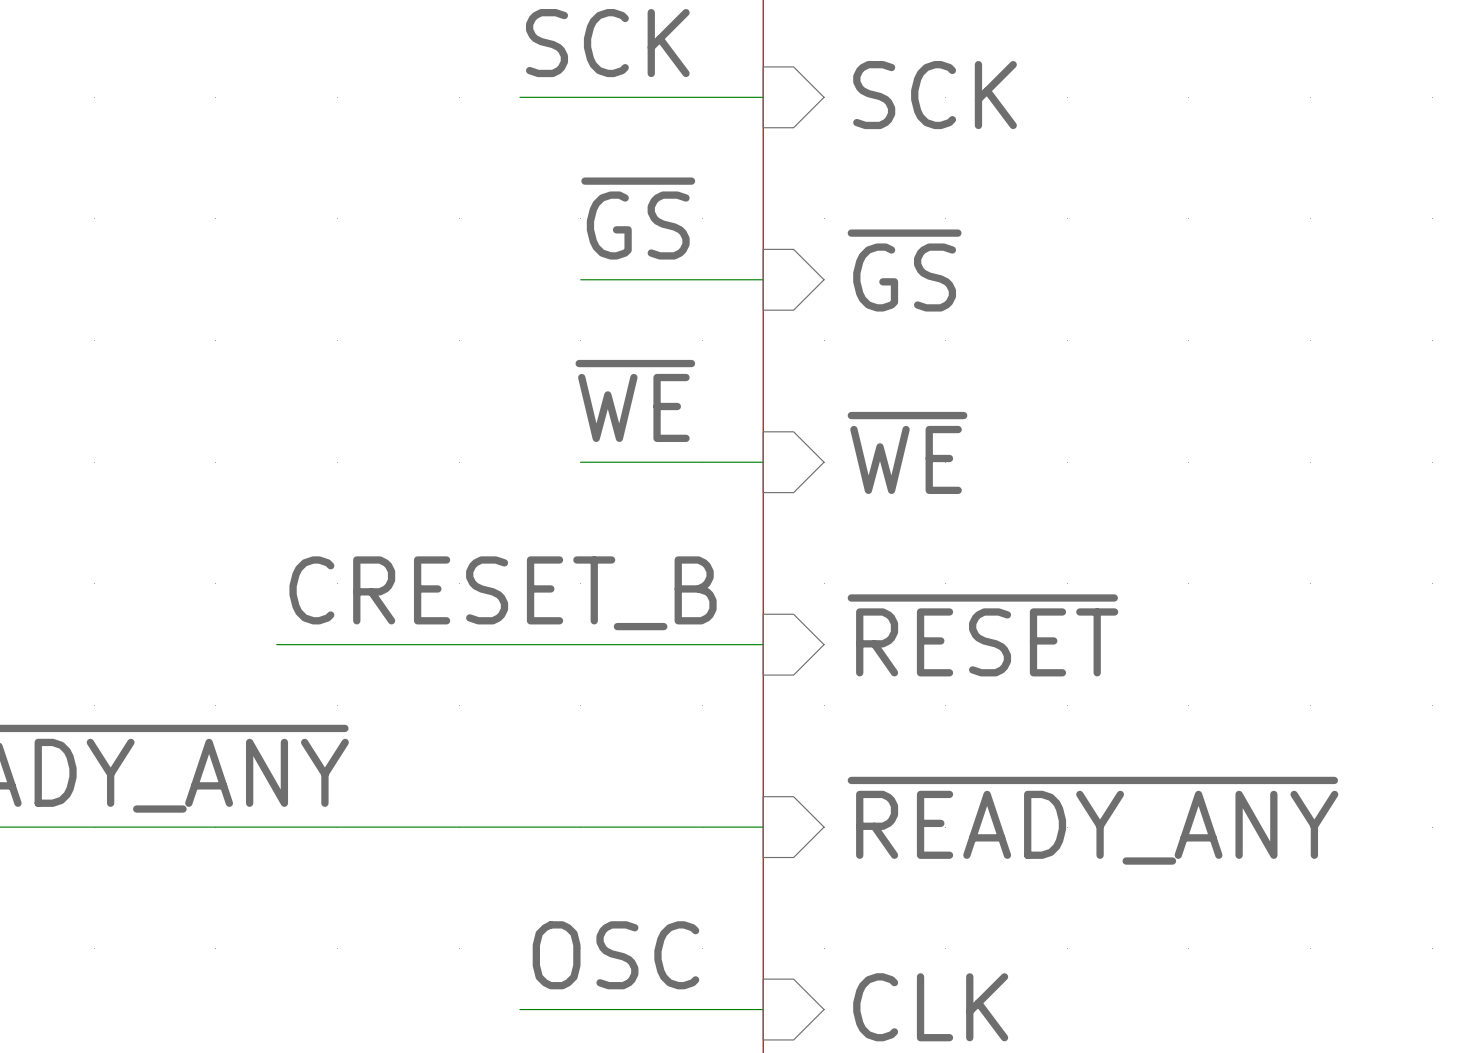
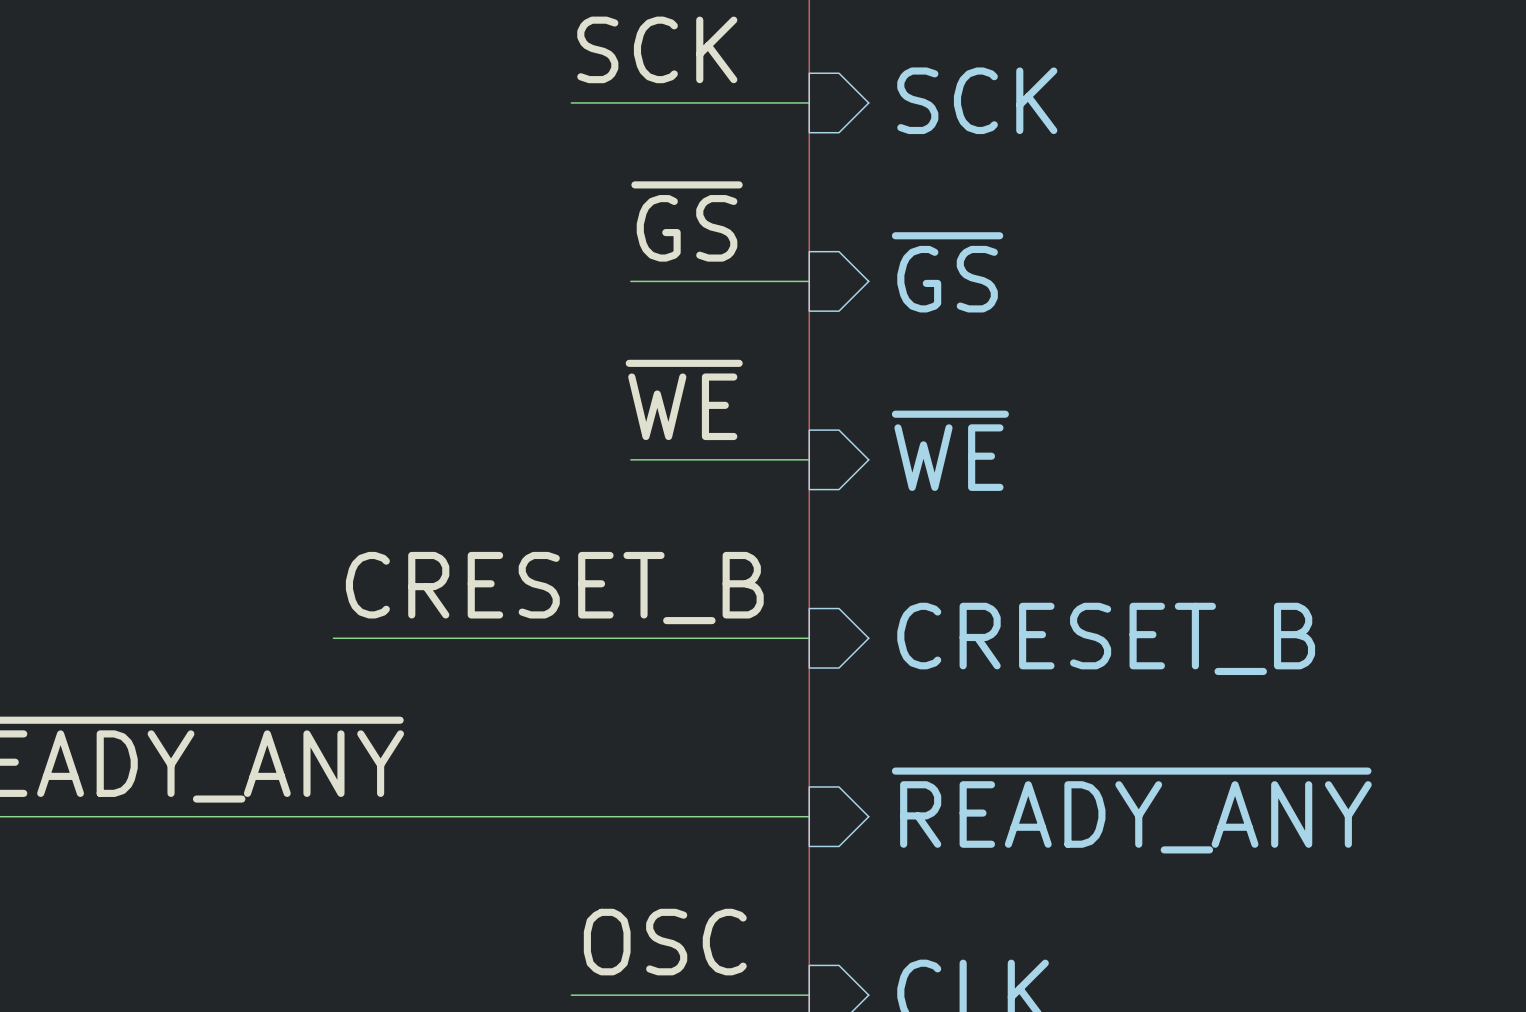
sheet pin: ~{RESET} (982, 635) -> CRESET_B (1106, 638)

